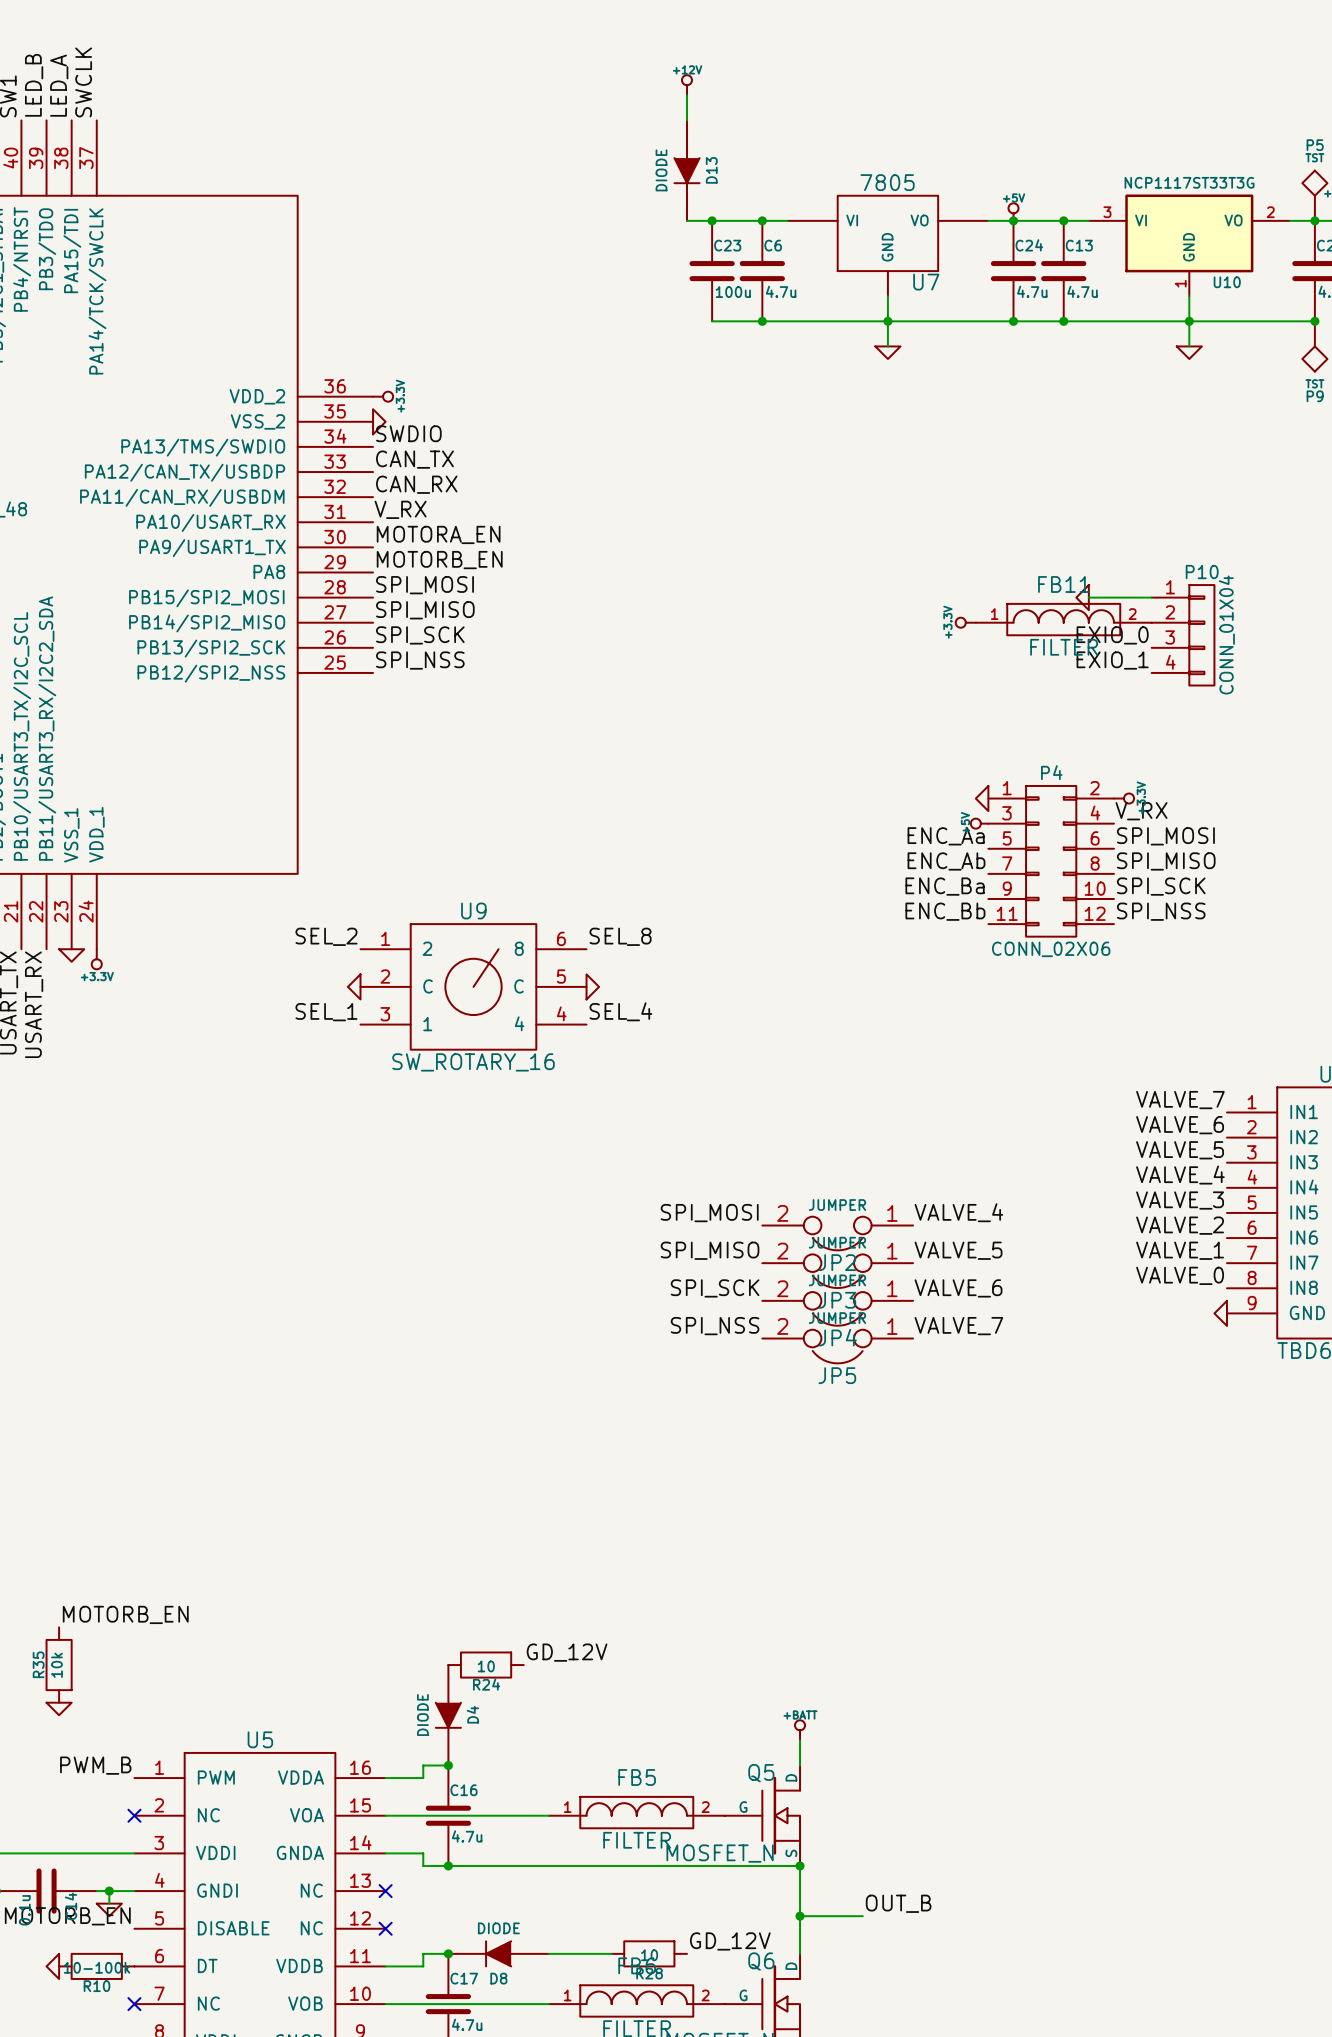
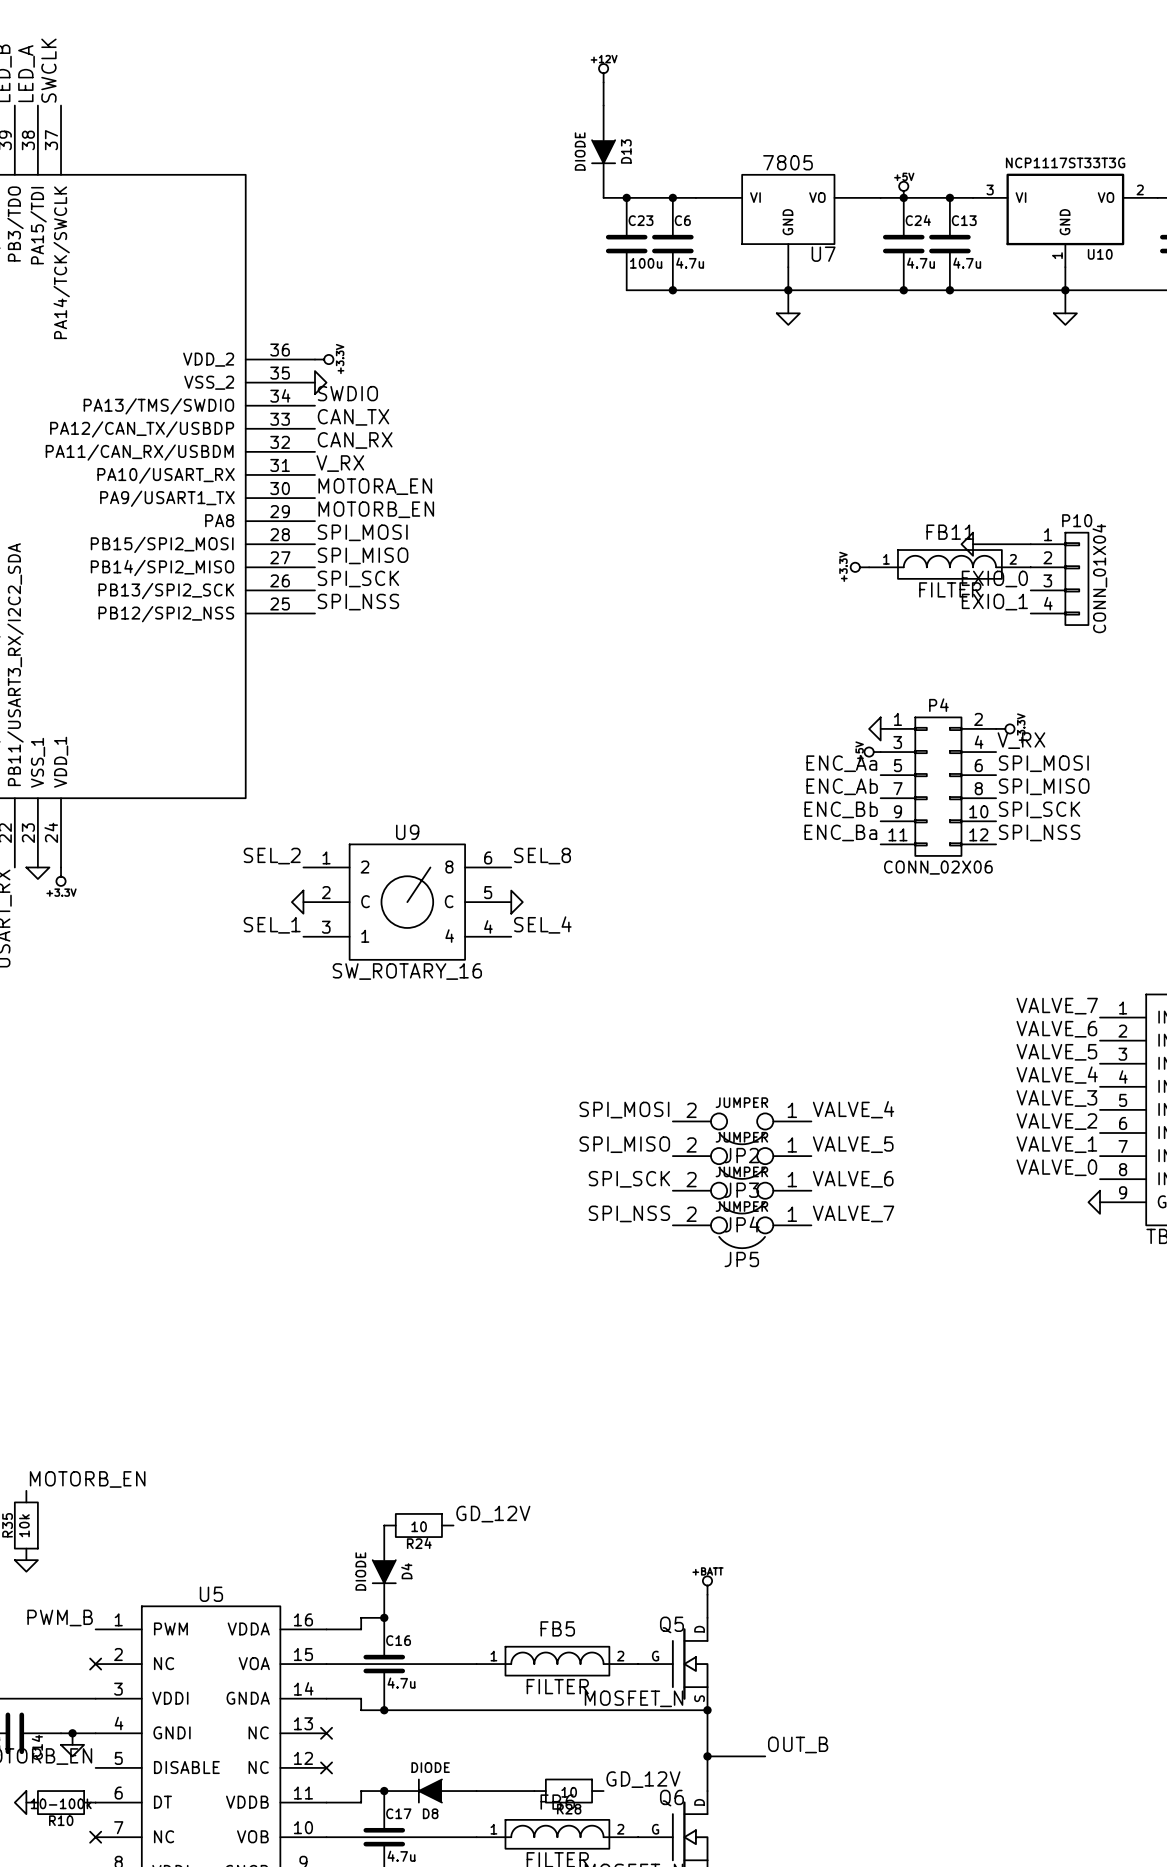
label: ENC_Ba (945, 886) -> ENC_Bb (841, 809)
label: ENC_Bb (945, 911) -> ENC_Ba (840, 832)

